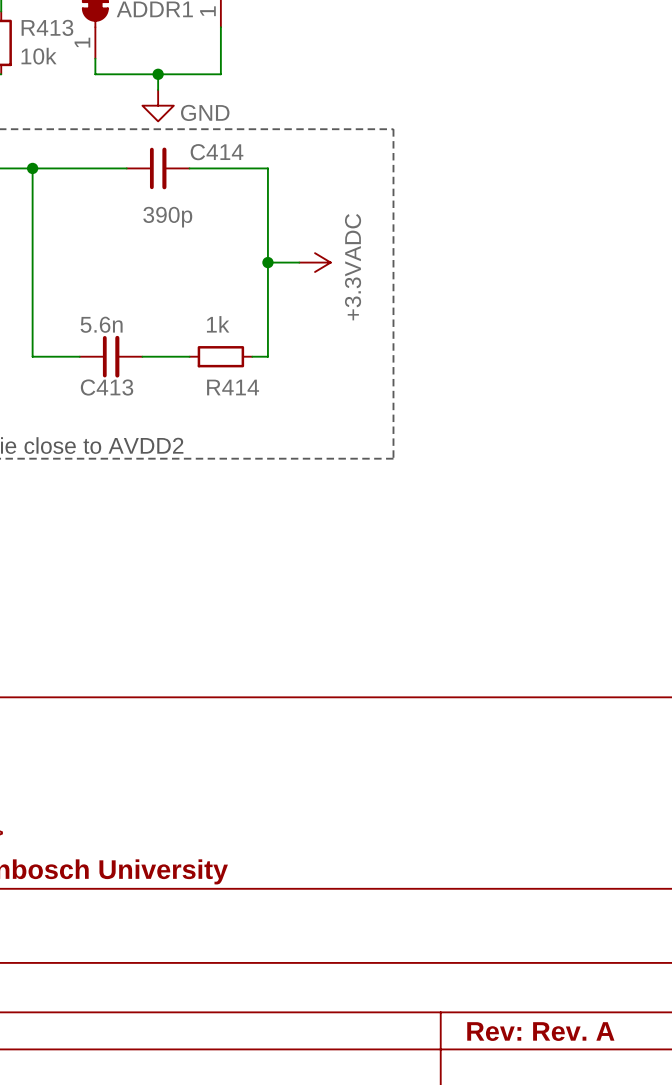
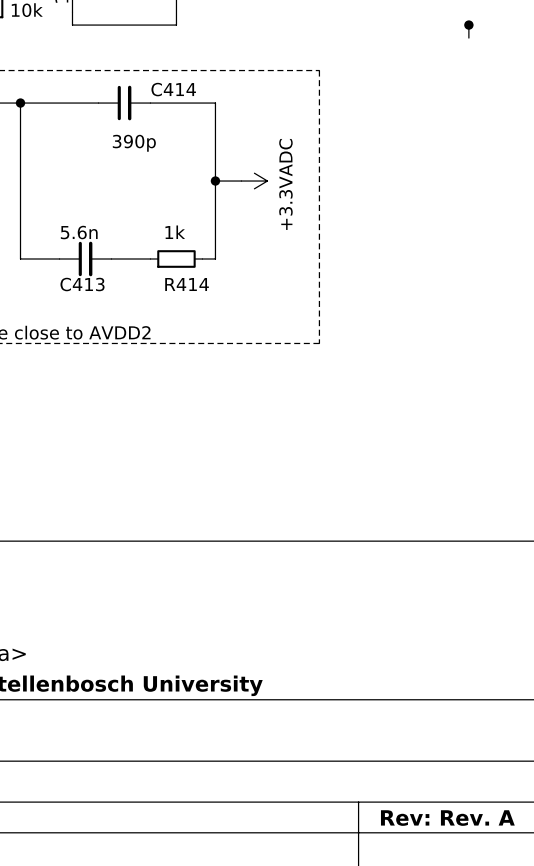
wire: (158, 74) (158, 89) -> none
junction: (158, 74) -> none
wire: none -> (468, 25) (468, 38)
junction: none -> (468, 25)
power symbol: GND (158, 105) -> none

